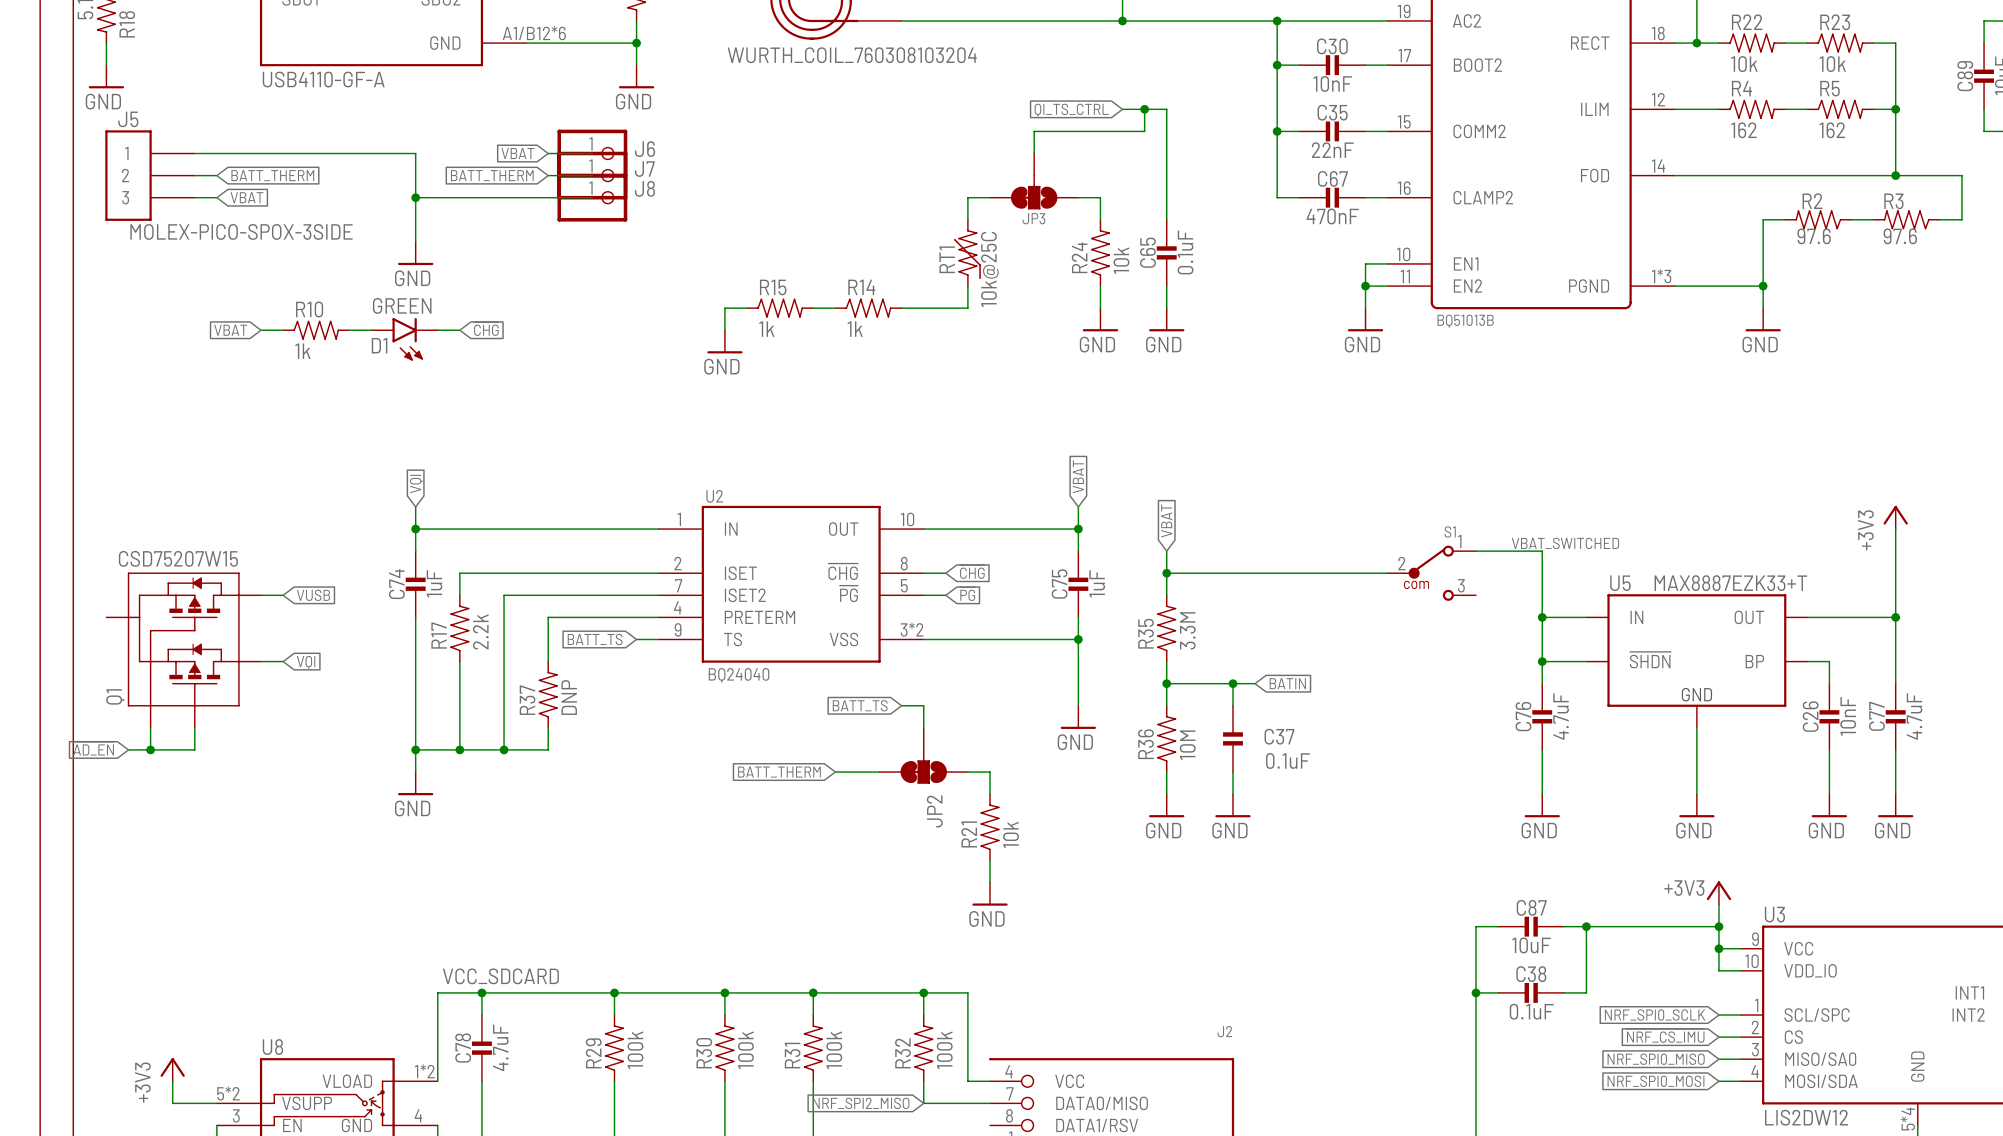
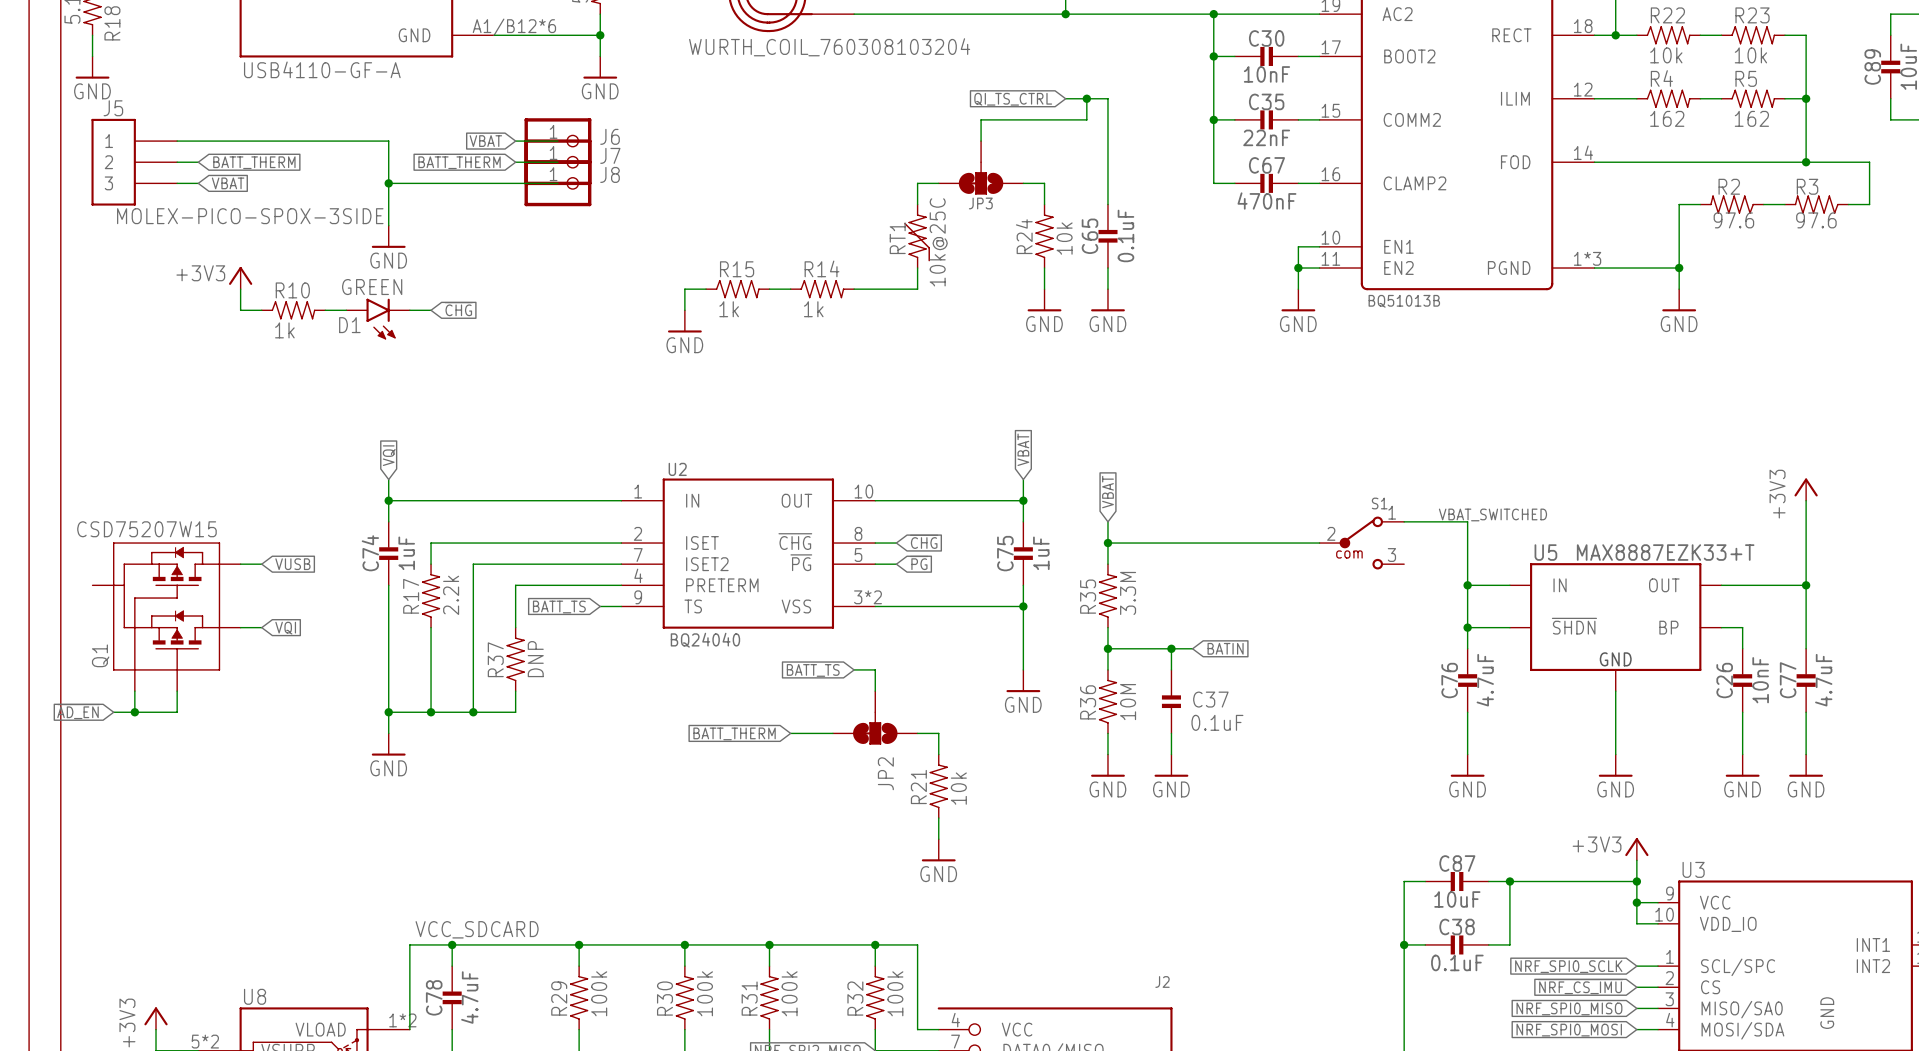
power symbol: none -> +3V3 (240, 278)
wire: none -> (240, 289) (240, 310)
global label: VBAT (230, 330) -> none

